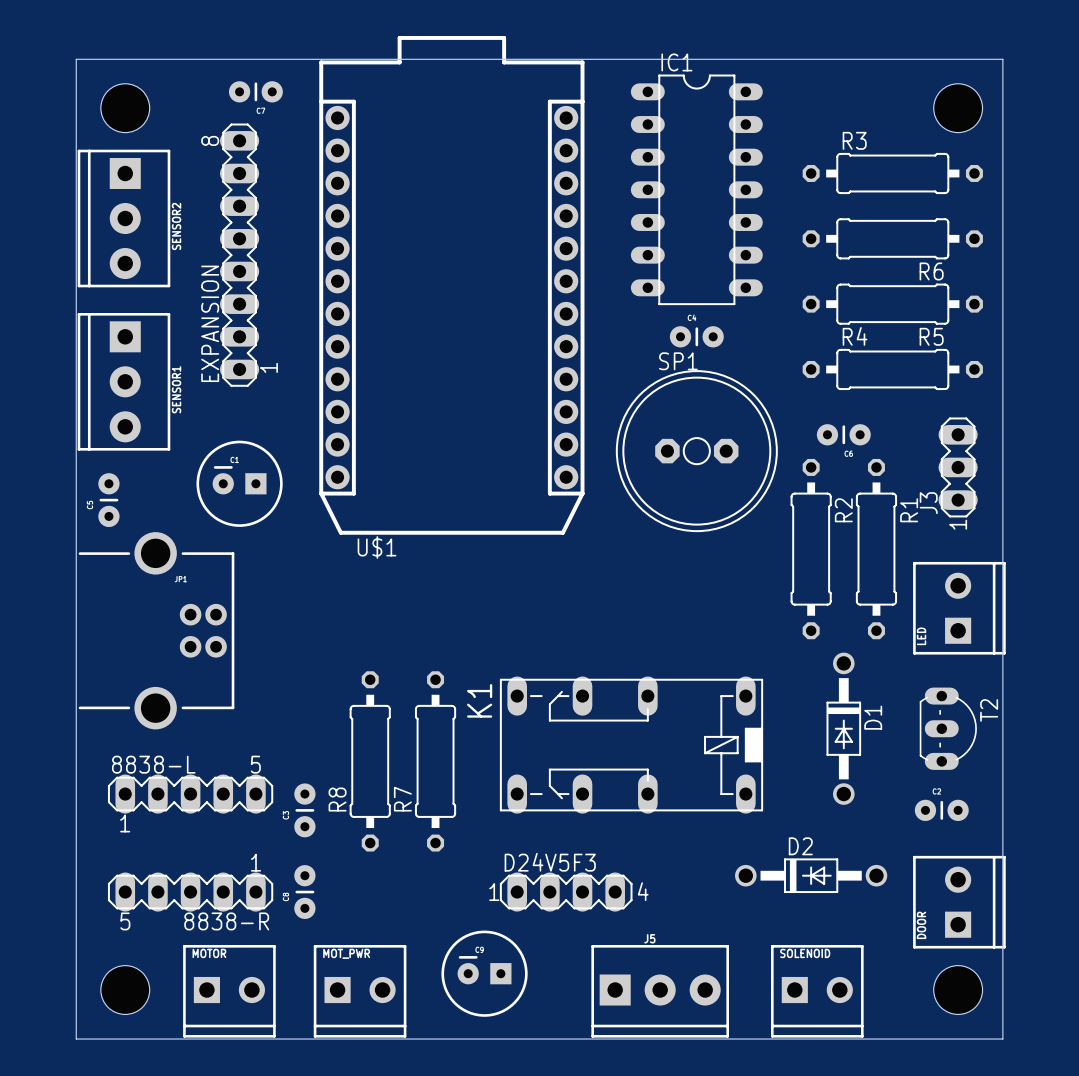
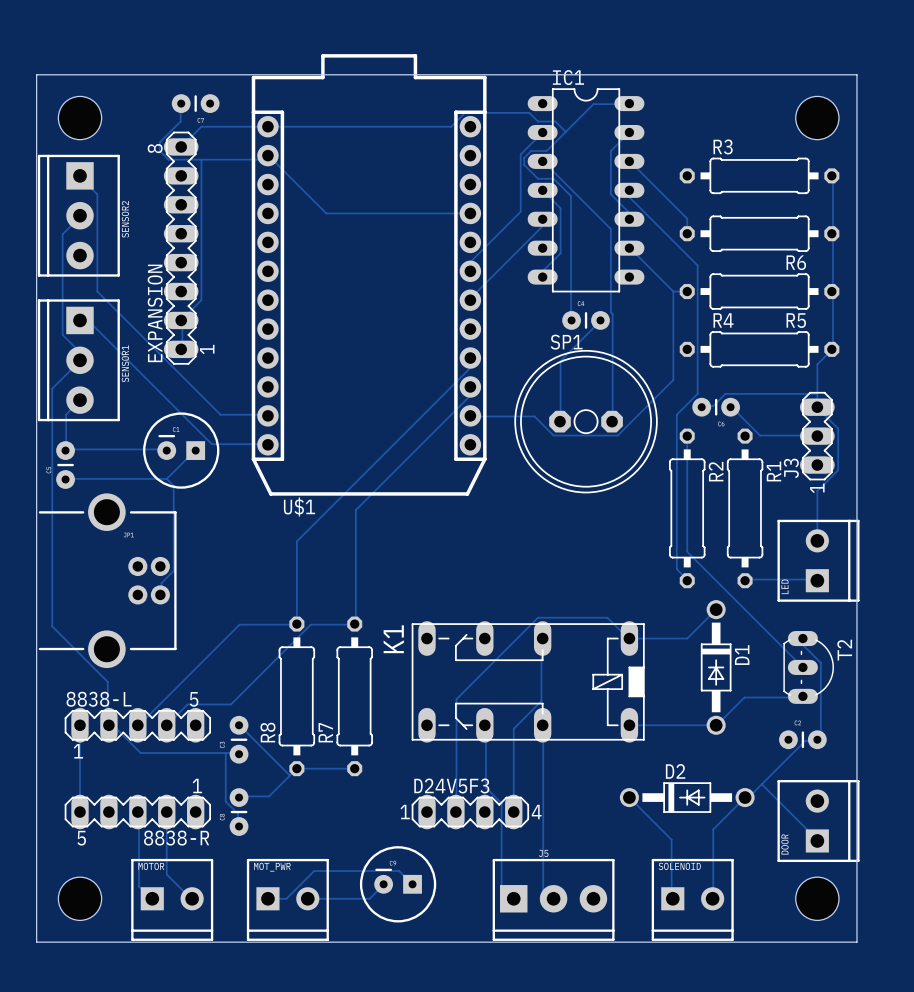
track: none -> (181, 103) (180, 121) (159, 142) (159, 151) (168, 159) (263, 159) (267, 155) (326, 213) (470, 213)
track: none -> (629, 103) (593, 104) (546, 151) (531, 151) (524, 157) (524, 164) (538, 178) (553, 178) (571, 196) (571, 320)
track: none -> (565, 131) (555, 121) (538, 121) (529, 112) (465, 112) (451, 126) (201, 126) (181, 146)
track: none -> (542, 132) (520, 154) (520, 211) (470, 262) (470, 271)
track: none -> (629, 132) (610, 151) (610, 194) (628, 211) (629, 219)
track: none -> (201, 159) (201, 300) (181, 320) (181, 349)
track: none -> (542, 161) (610, 229) (612, 421)
track: none -> (629, 161) (687, 218) (687, 233)
track: none -> (80, 175) (97, 194) (97, 291) (220, 414) (267, 415)
track: none -> (831, 175) (832, 348) (817, 364) (817, 407) (838, 428) (838, 470) (817, 491) (817, 540)
track: none -> (542, 190) (560, 208) (560, 253) (543, 270) (542, 277)
track: none -> (629, 190) (629, 197) (697, 265) (697, 393) (676, 414) (676, 569) (687, 580)
track: none -> (80, 215) (62, 234) (62, 334) (80, 352) (80, 360) (52, 388) (52, 626) (107, 681) (107, 725) (112, 725) (140, 753) (239, 754)
track: none -> (542, 219) (541, 227) (470, 300)
track: none -> (629, 248) (673, 291)
track: none -> (673, 291) (687, 291)
track: none -> (673, 291) (673, 380) (617, 435) (553, 435) (534, 416) (470, 415)
track: none -> (80, 320) (88, 321) (211, 444) (267, 444)
track: none -> (600, 320) (560, 360) (560, 421)
track: none -> (470, 358) (470, 367) (296, 541) (296, 624) (239, 624) (137, 725)
track: none -> (470, 386) (470, 395) (355, 510) (355, 622) (354, 624) (310, 624) (230, 704) (187, 704) (166, 725)
track: none -> (817, 393) (725, 393) (713, 406) (701, 407)
track: none -> (80, 400) (66, 414) (66, 449)
track: none -> (730, 407) (760, 435) (817, 436)
track: none -> (687, 436) (687, 551) (802, 667)
track: none -> (66, 449) (166, 450)
track: none -> (195, 450) (166, 478)
track: none -> (166, 478) (65, 479)
track: none -> (166, 478) (173, 485) (173, 570) (161, 583) (160, 594)
track: none -> (745, 580) (817, 580)
track: none -> (716, 609) (687, 638) (628, 638) (607, 617) (538, 617) (456, 699) (455, 812)
track: none -> (542, 638) (541, 700) (513, 728) (513, 812)
track: none -> (802, 638) (803, 645) (820, 662) (820, 735) (817, 740) (805, 740) (749, 796) (746, 796) (713, 829) (712, 898)
track: none -> (802, 696) (744, 697) (716, 725) (629, 725)
track: none -> (80, 725) (80, 812)
track: none -> (239, 725) (289, 775)
track: none -> (484, 725) (485, 787) (501, 803) (501, 886) (513, 898)
track: none -> (542, 725) (543, 890) (553, 898)
track: none -> (225, 753) (225, 801) (237, 813) (239, 826)
track: none -> (354, 768) (296, 768) (269, 796) (239, 797)
track: none -> (761, 784) (817, 840)
track: none -> (629, 797) (671, 839) (672, 898)
track: none -> (137, 812) (138, 886) (152, 898)
track: none -> (166, 812) (166, 874) (192, 898)
track: none -> (383, 884) (369, 898) (307, 898)
track: none -> (412, 884) (399, 871) (314, 871) (286, 898) (267, 898)

